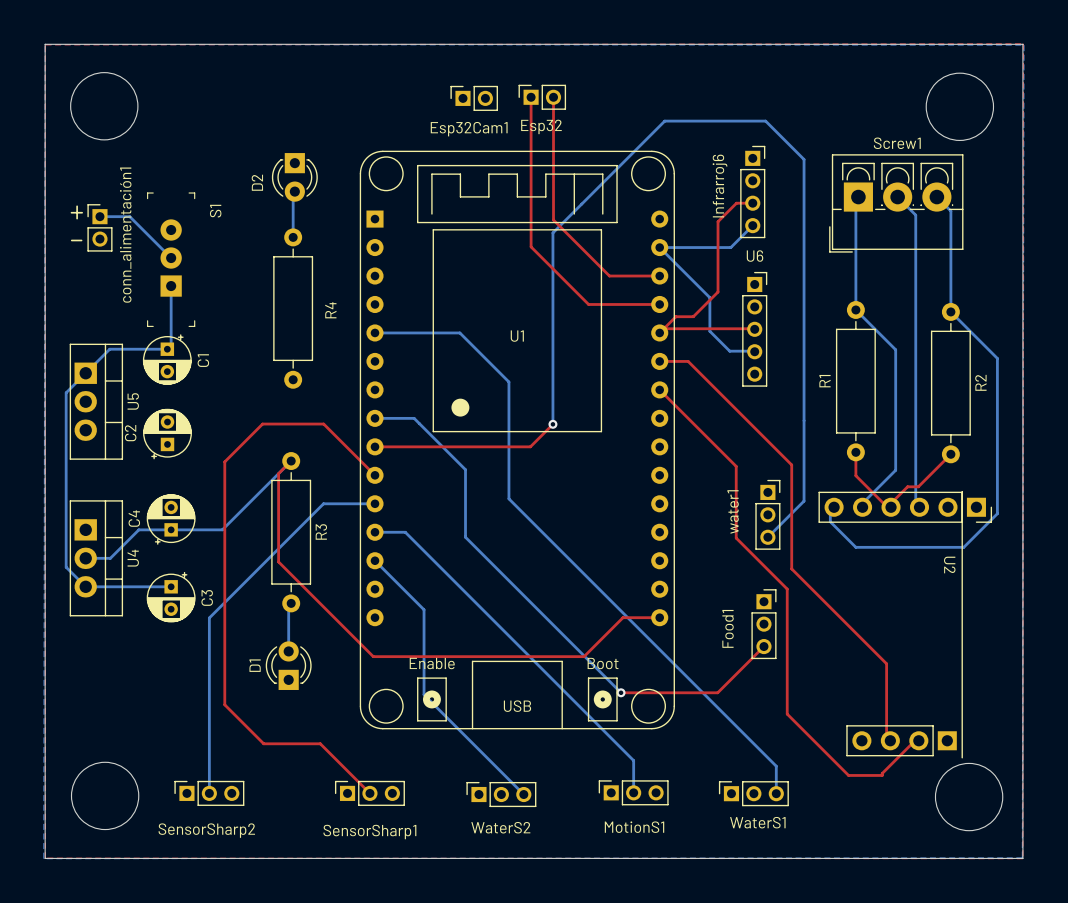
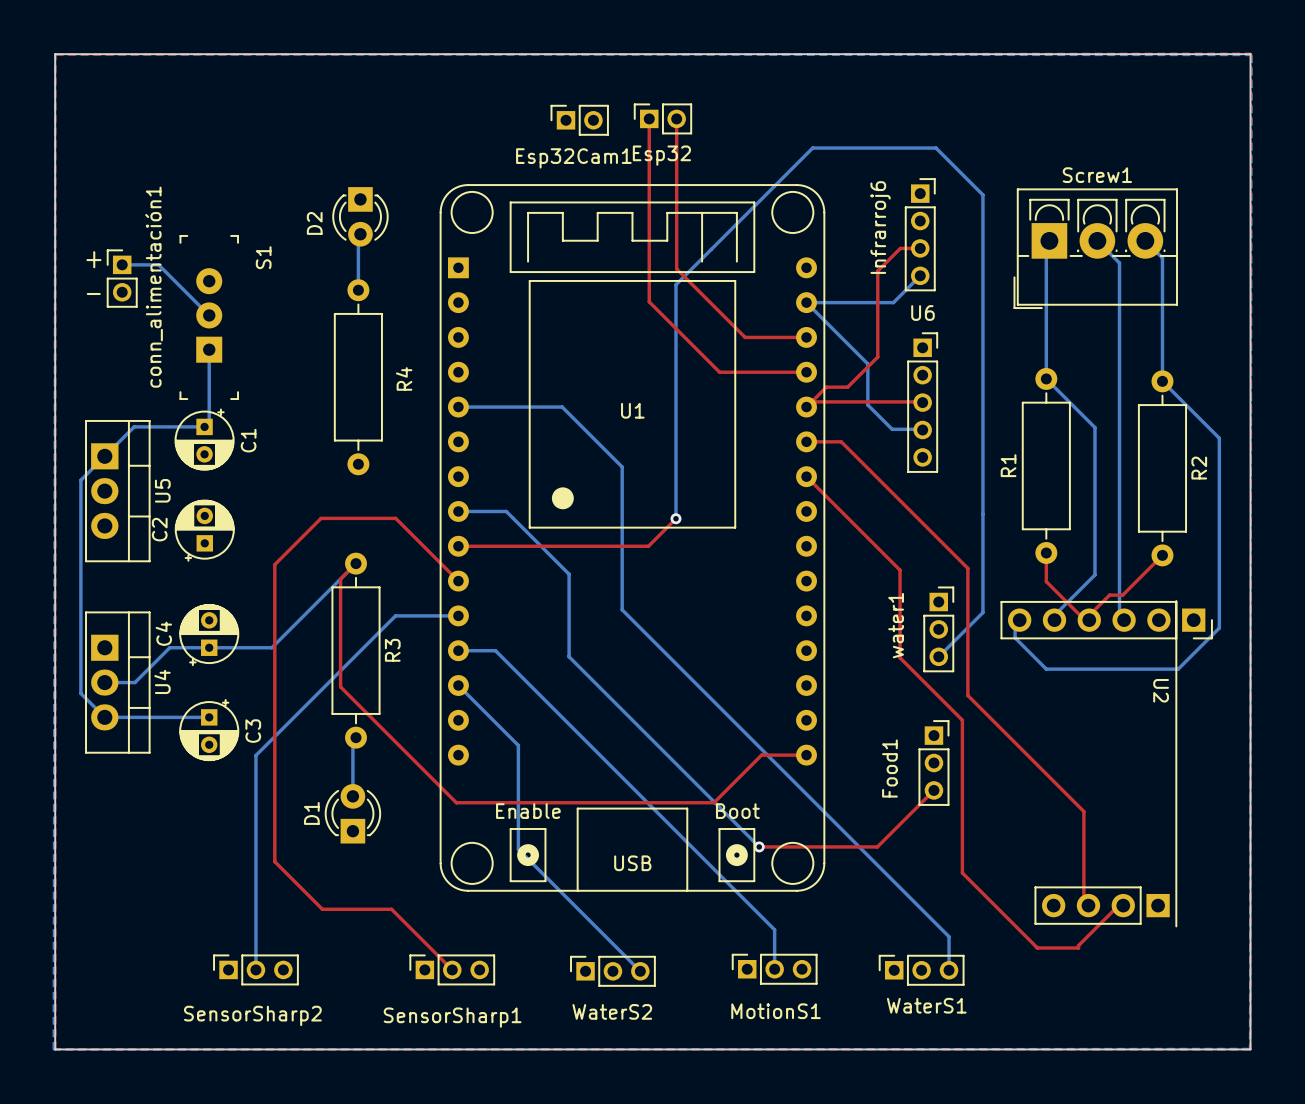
round board edge: [70, 72, 139, 141] -> none
round board edge: [925, 72, 995, 142] -> none
round board edge: [70, 761, 140, 831] -> none
round board edge: [934, 762, 1004, 832] -> none

